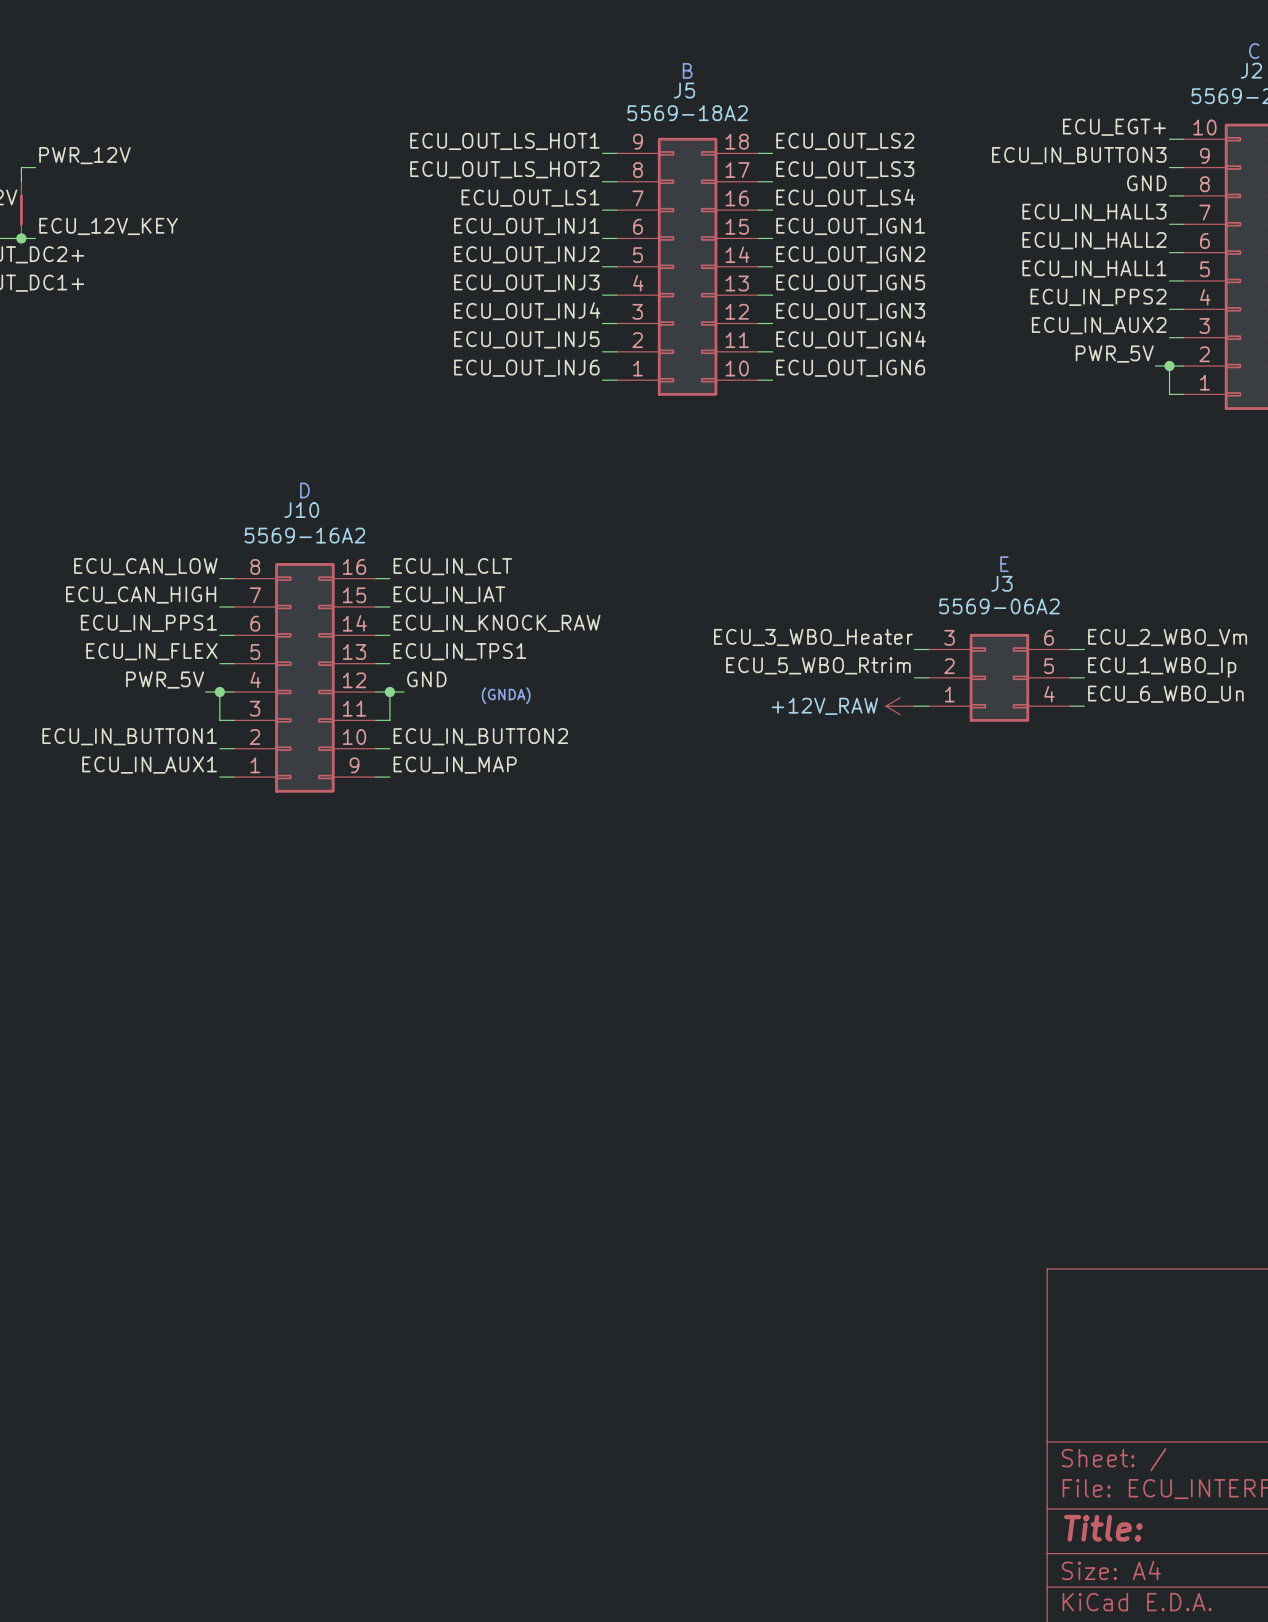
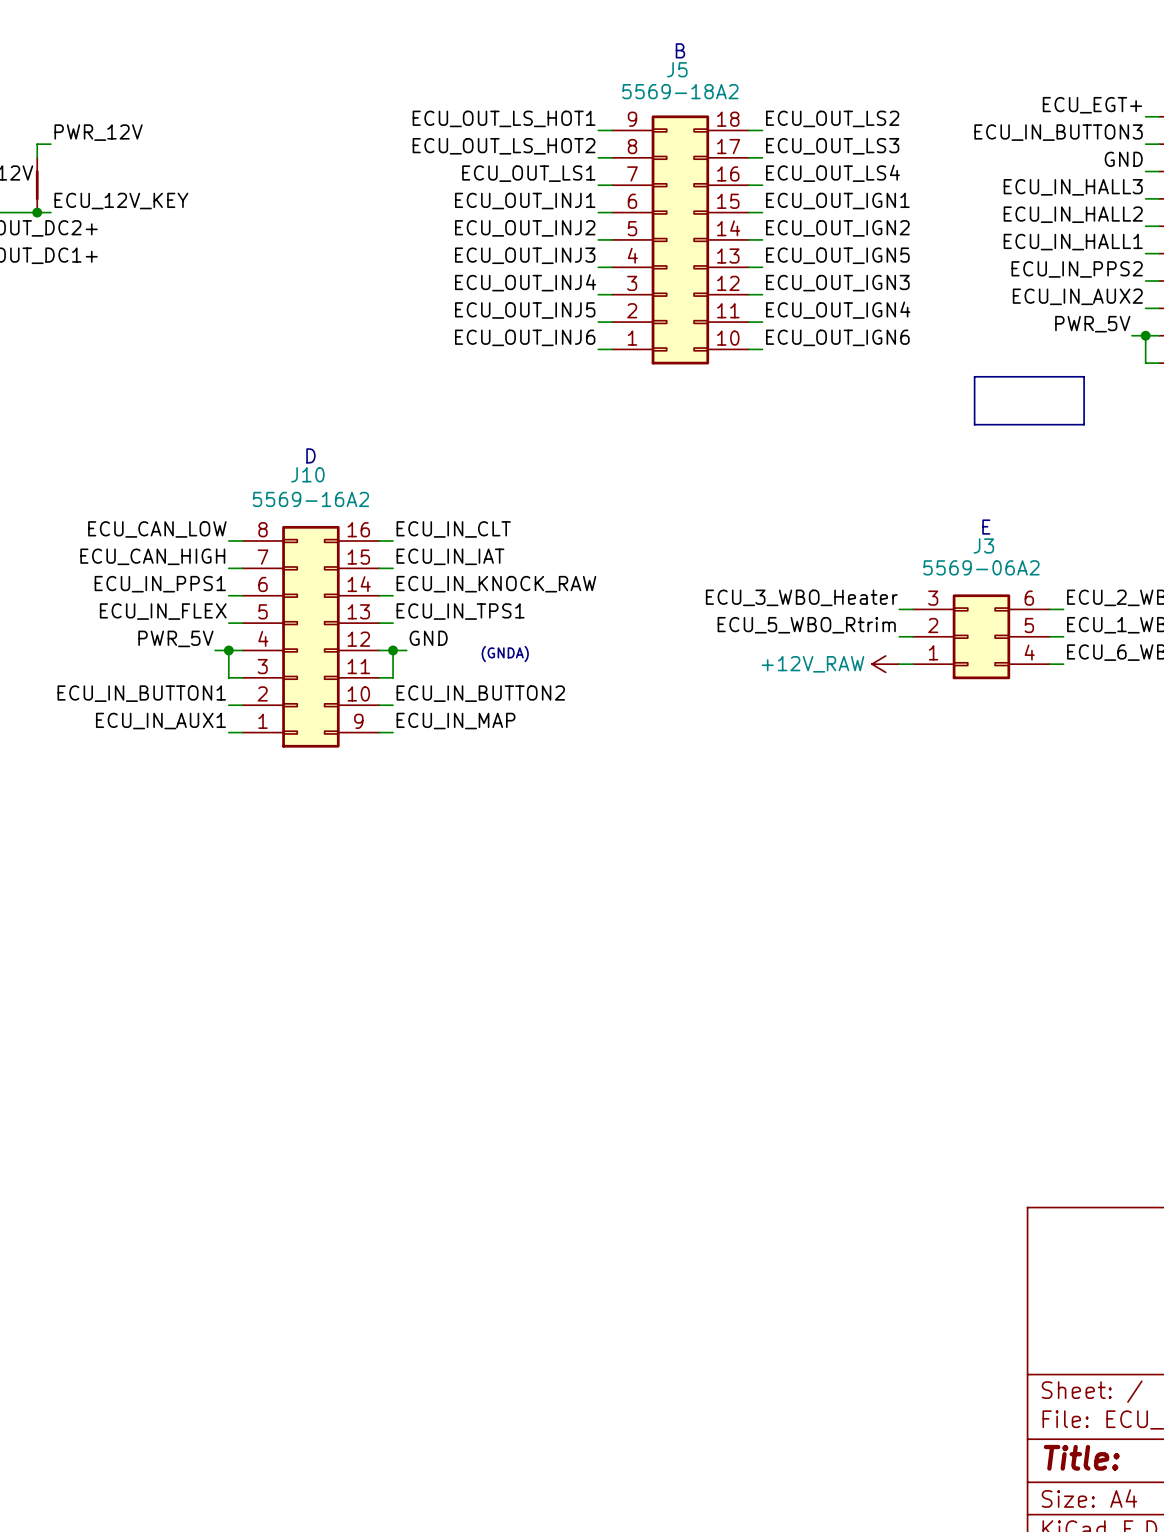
line: none -> (974, 376) (1084, 376) (1084, 424) (974, 424) (974, 376)

